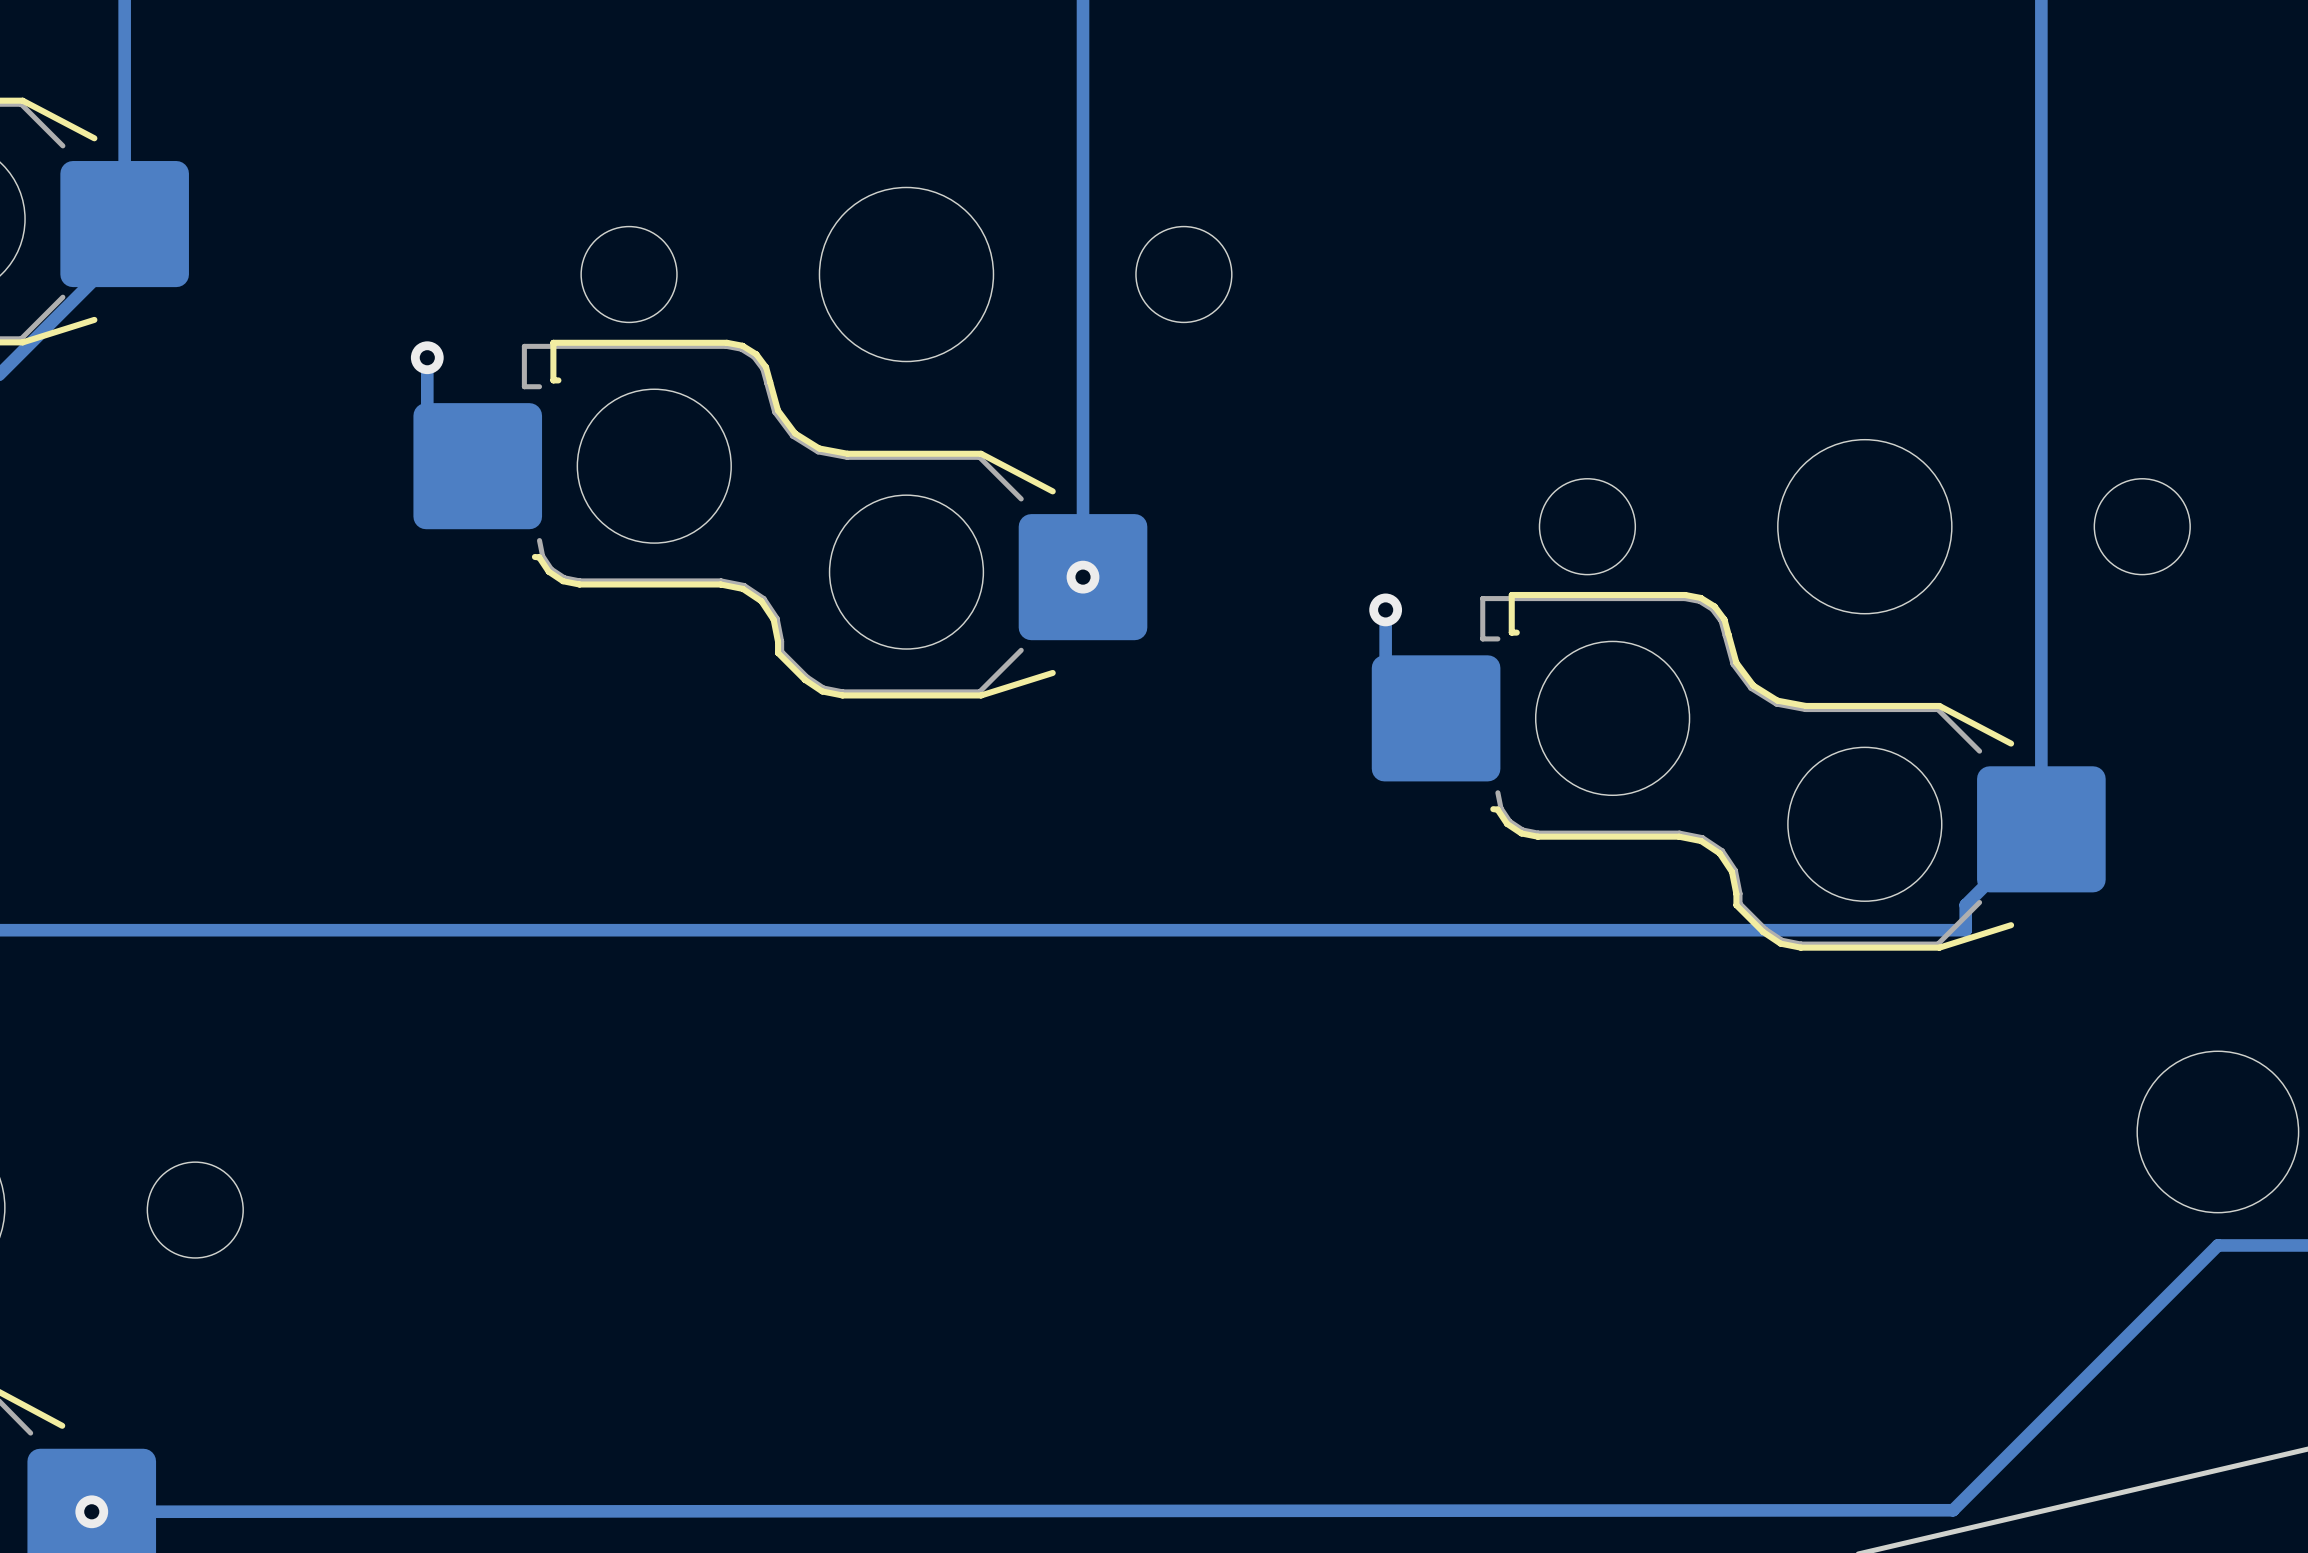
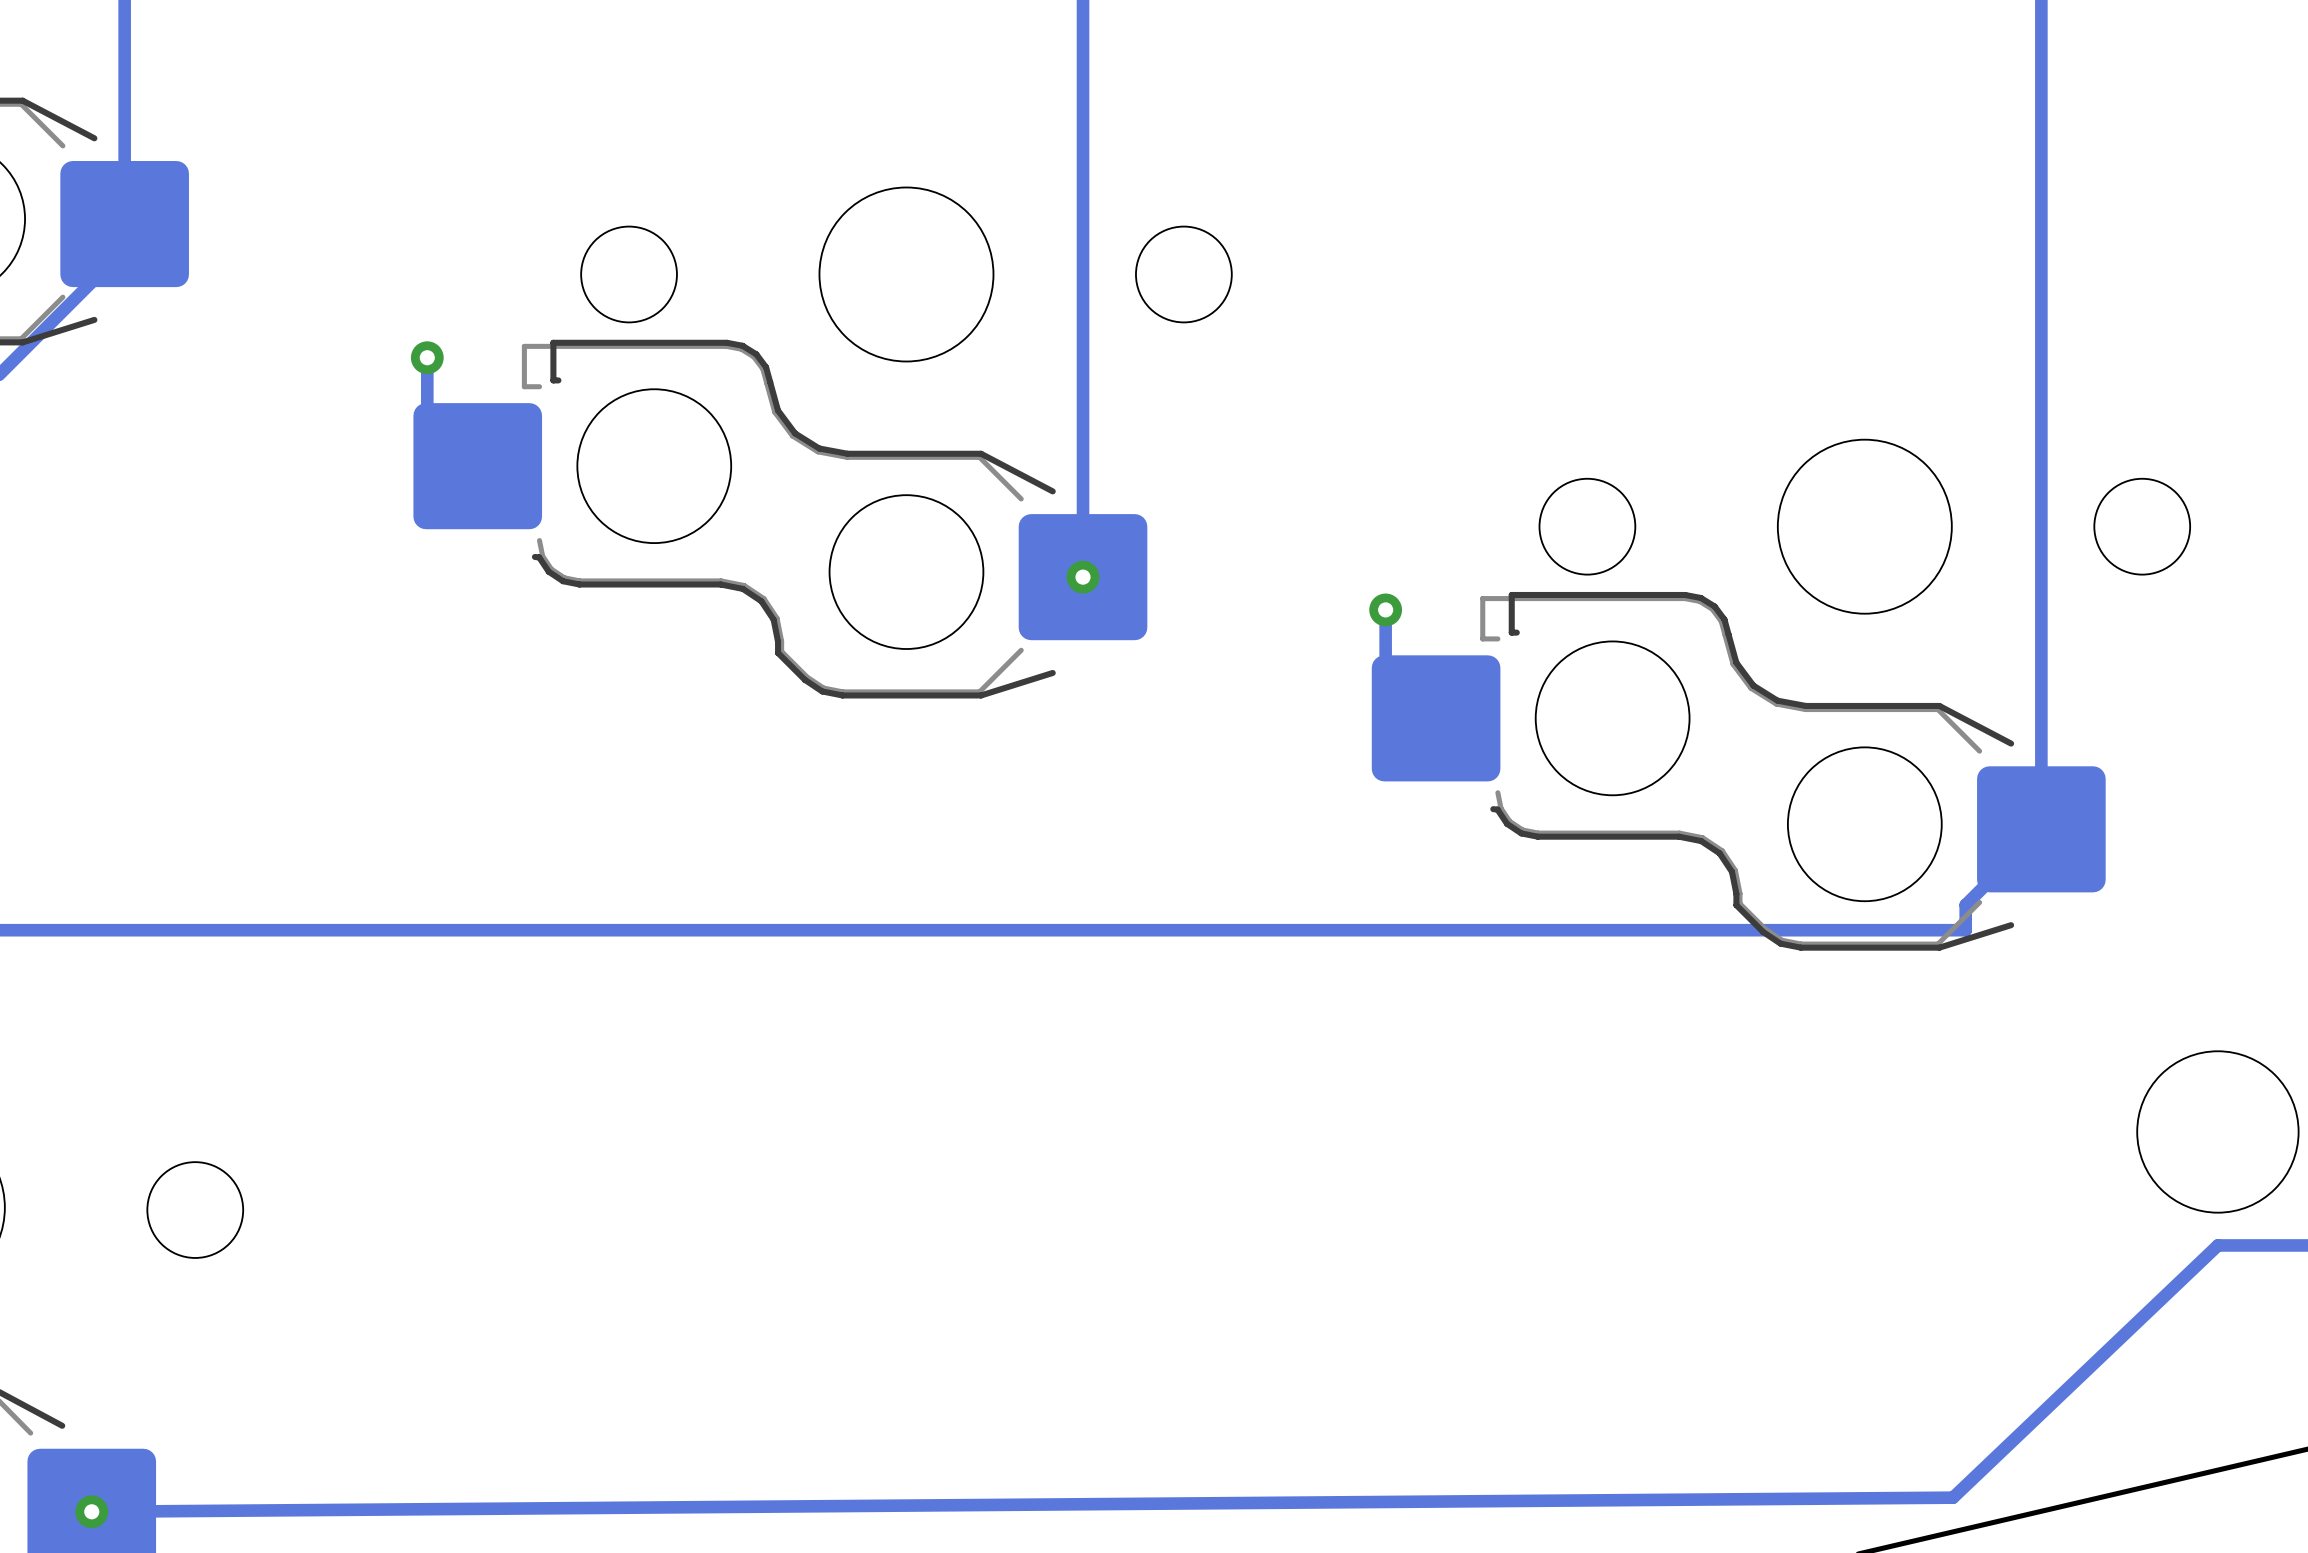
track: (2217, 1245) (1953, 1510) (91, 1511) -> (2217, 1245) (1953, 1497) (91, 1511)

